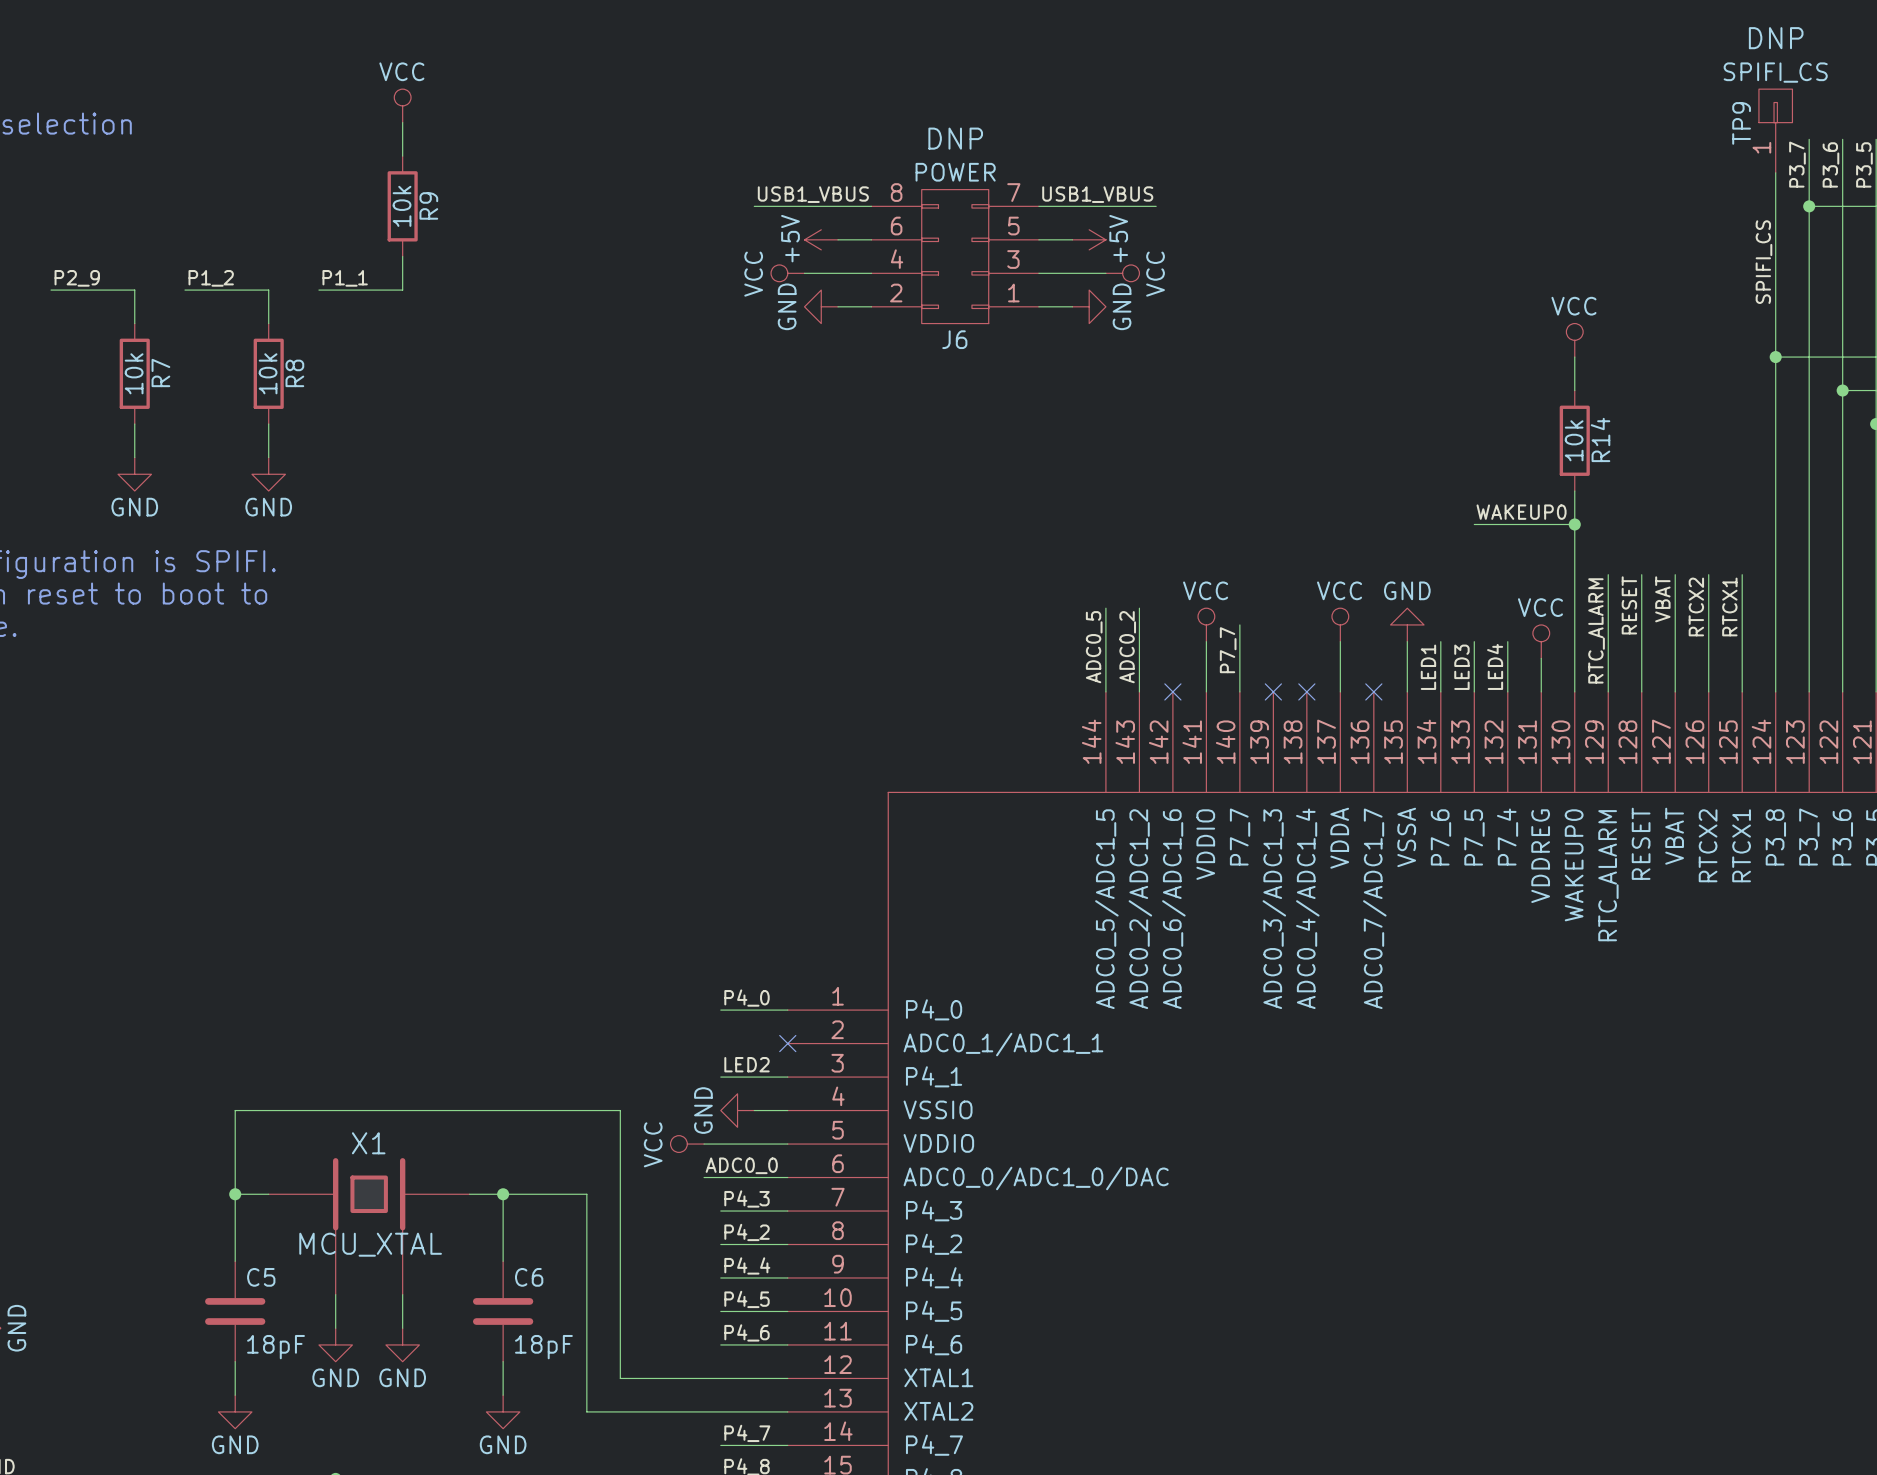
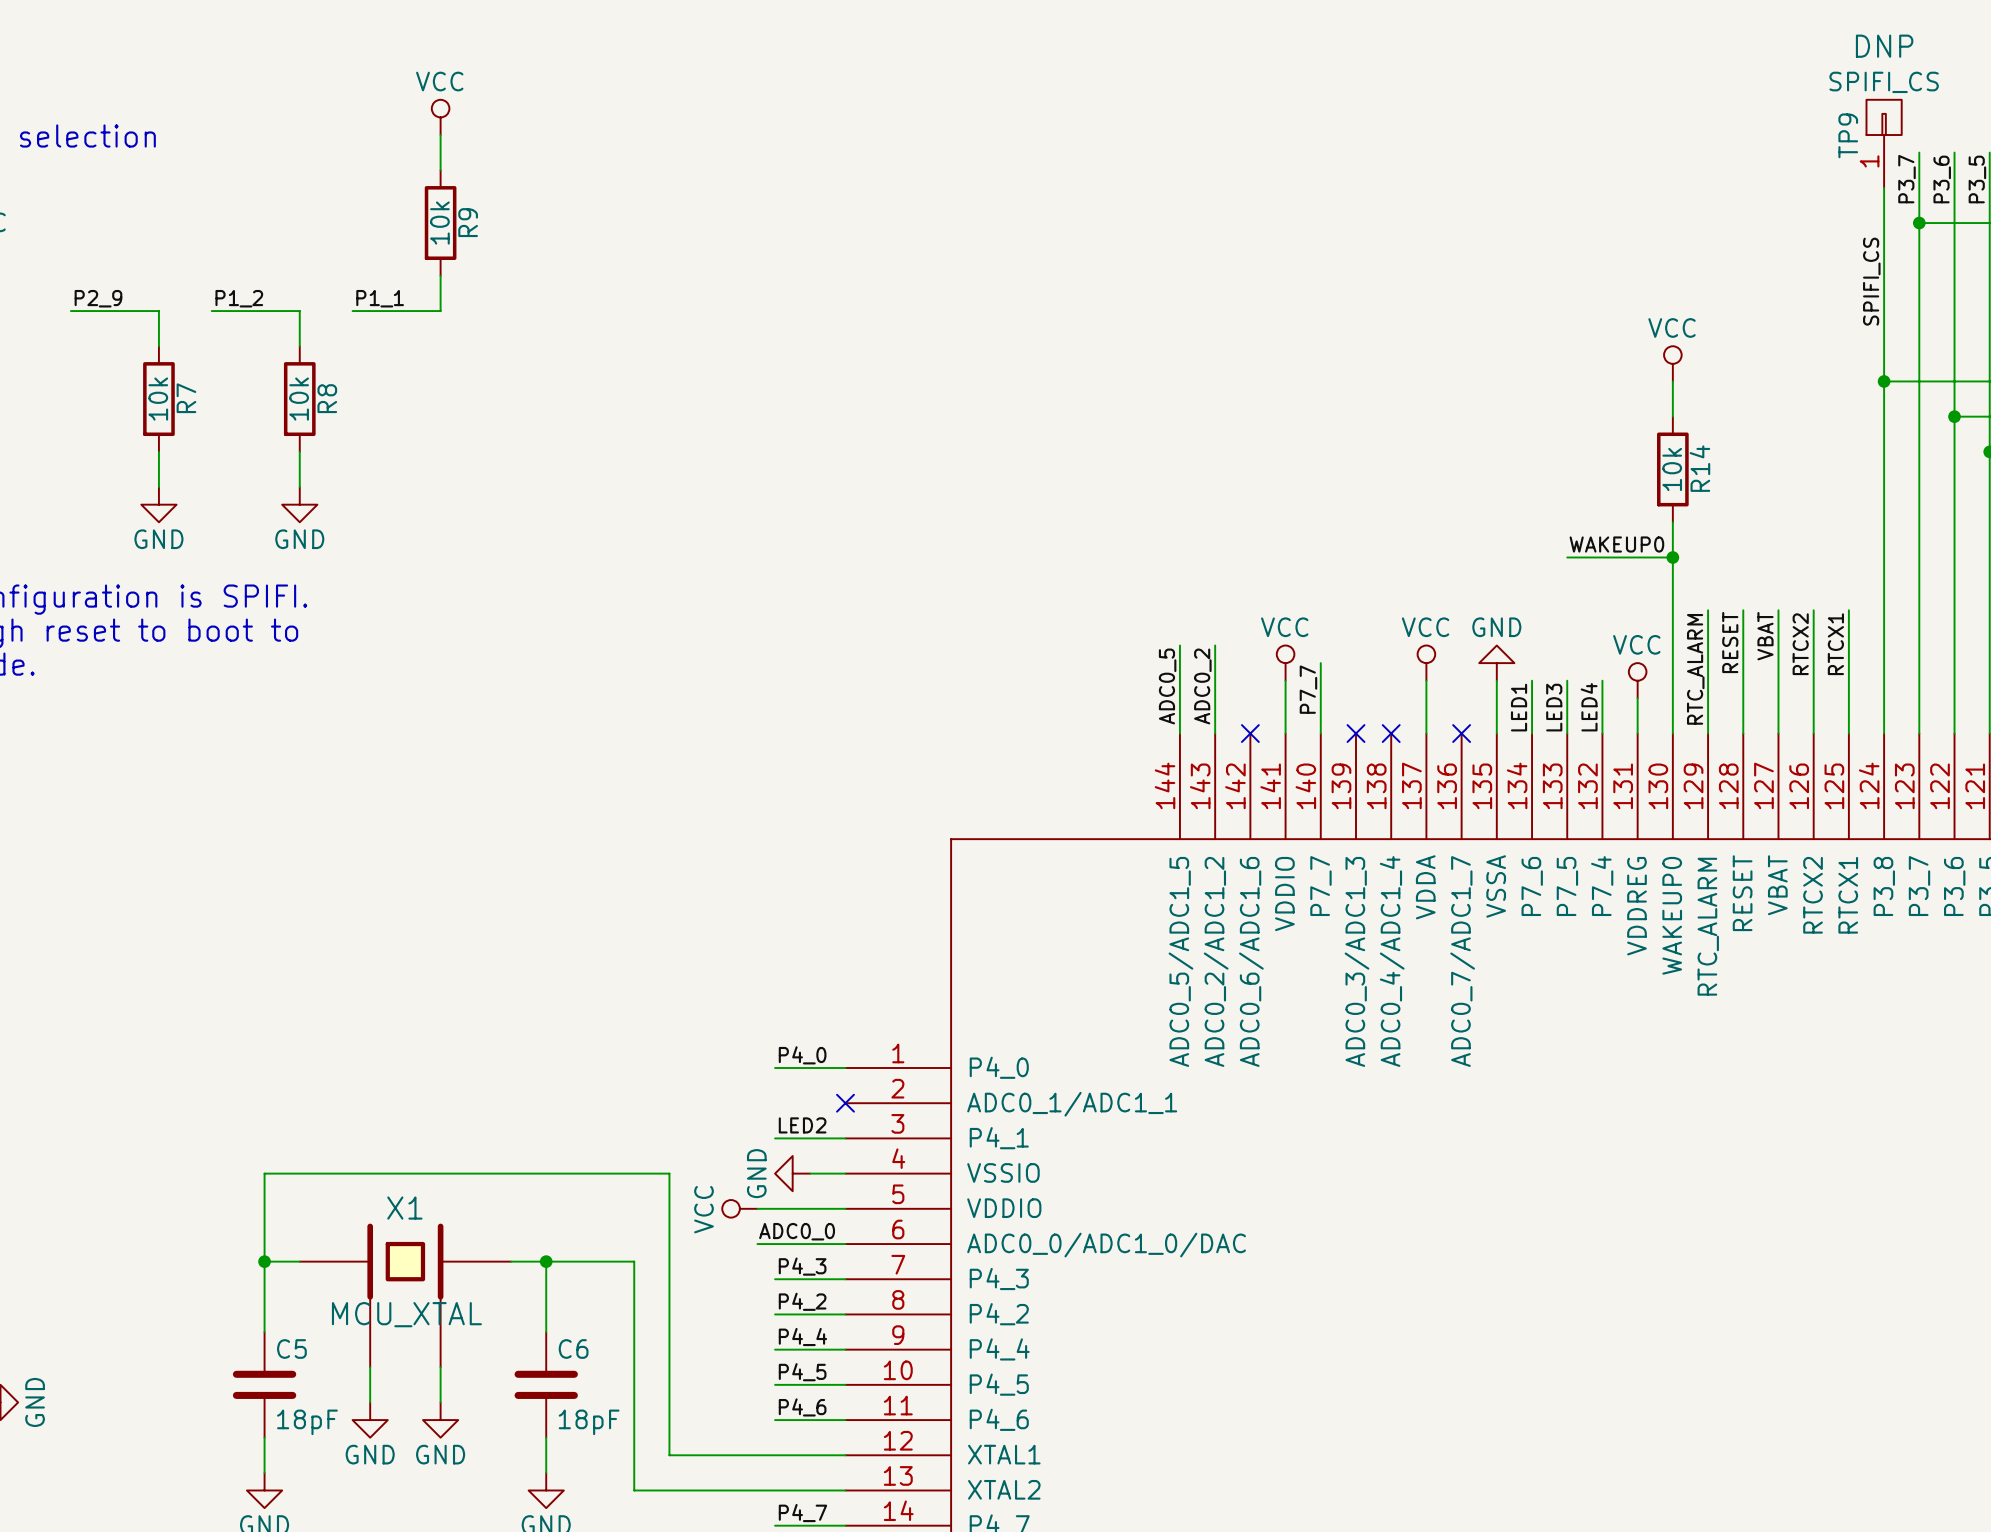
label: USB1_VBUS (813, 194) -> none
label: USB1_VBUS (1097, 194) -> none
wire: (754, 206) (871, 206) -> none
wire: (1038, 206) (1156, 206) -> none
power symbol: +5V (821, 239) -> none
wire: (838, 239) (871, 239) -> none
wire: (1038, 239) (1072, 239) -> none
power symbol: +5V (1089, 239) -> none
J6: POWER (955, 256) -> none
power symbol: VCC (787, 273) -> none
wire: (804, 273) (871, 273) -> none
wire: (1038, 273) (1105, 273) -> none
power symbol: VCC (1122, 273) -> none
power symbol: GND (821, 306) -> none
wire: (838, 306) (871, 306) -> none
wire: (1038, 306) (1072, 306) -> none
power symbol: GND (1089, 306) -> none

